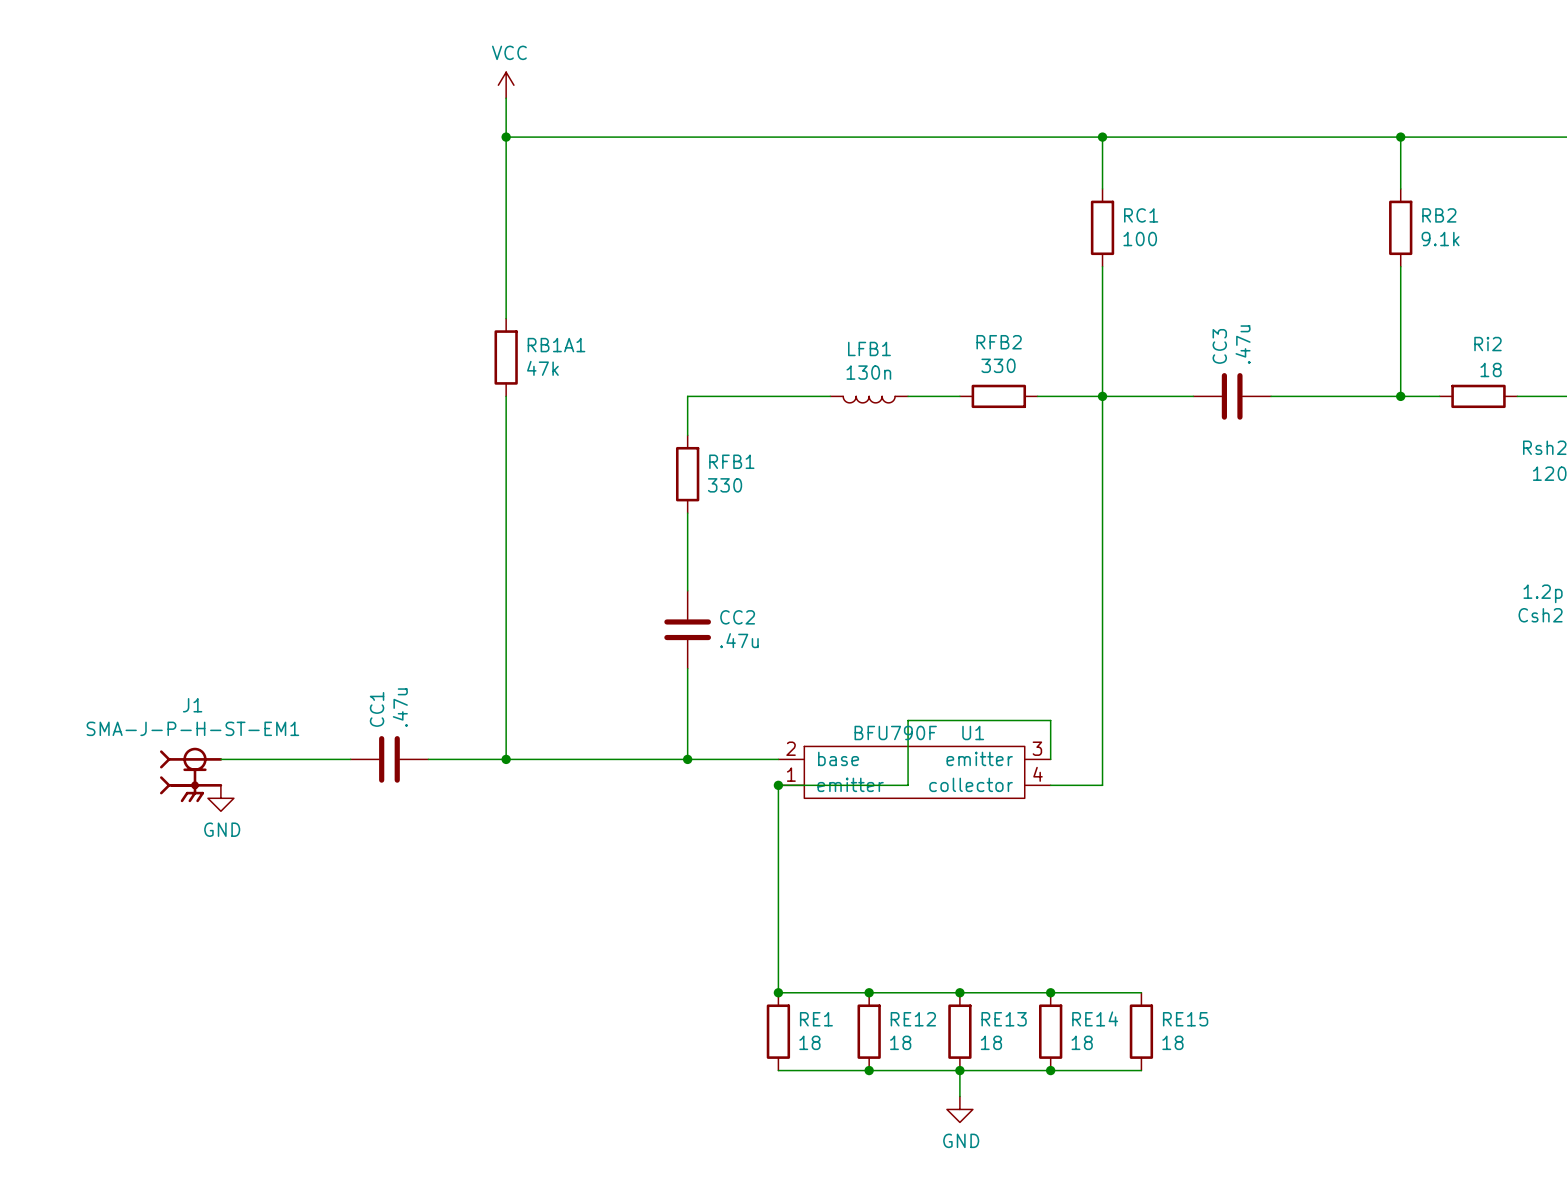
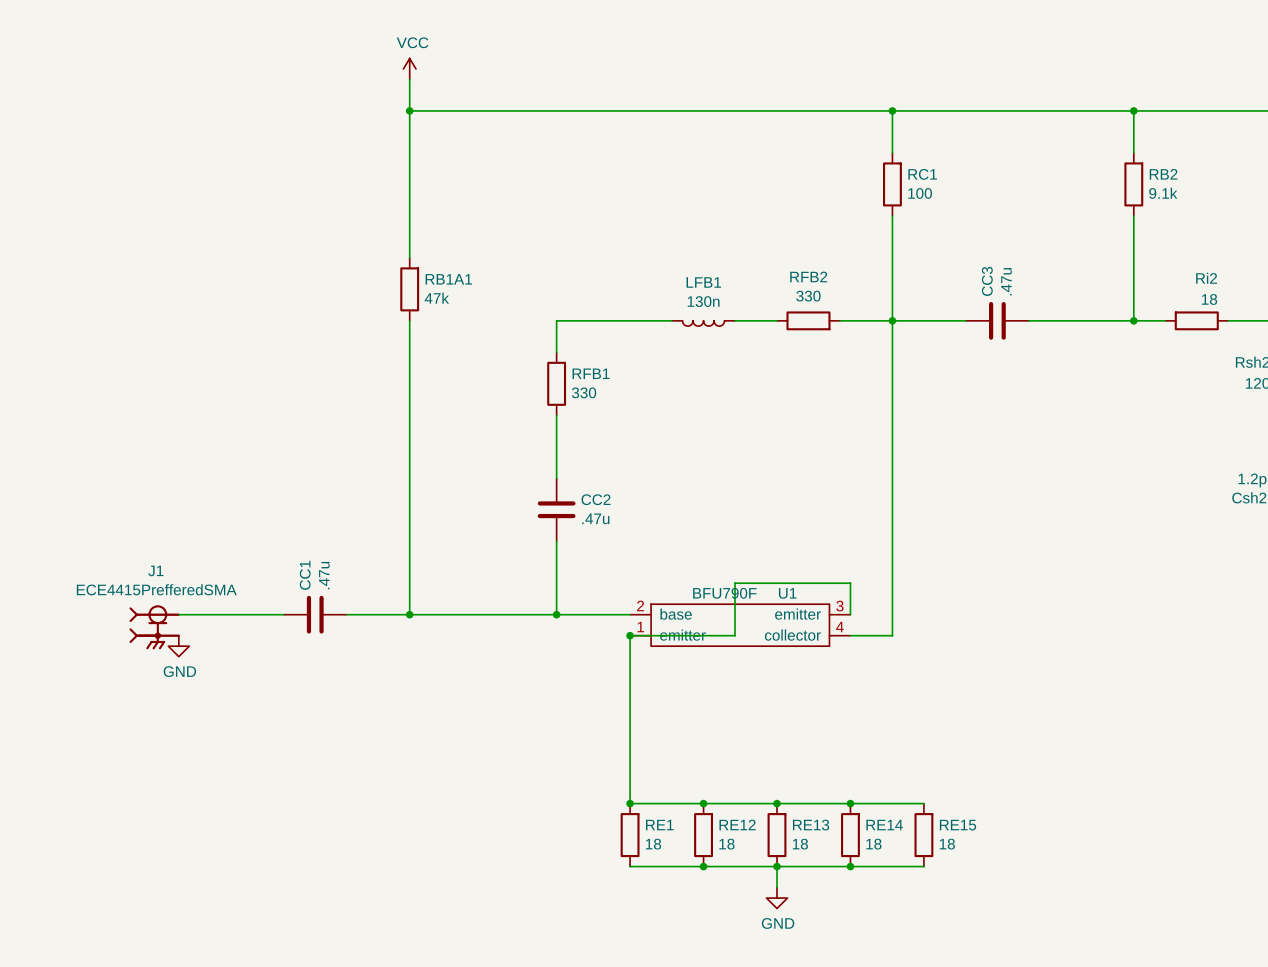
J1 value: SMA-J-P-H-ST-EM1 (192, 728) -> ECE4415PrefferedSMA (156, 589)

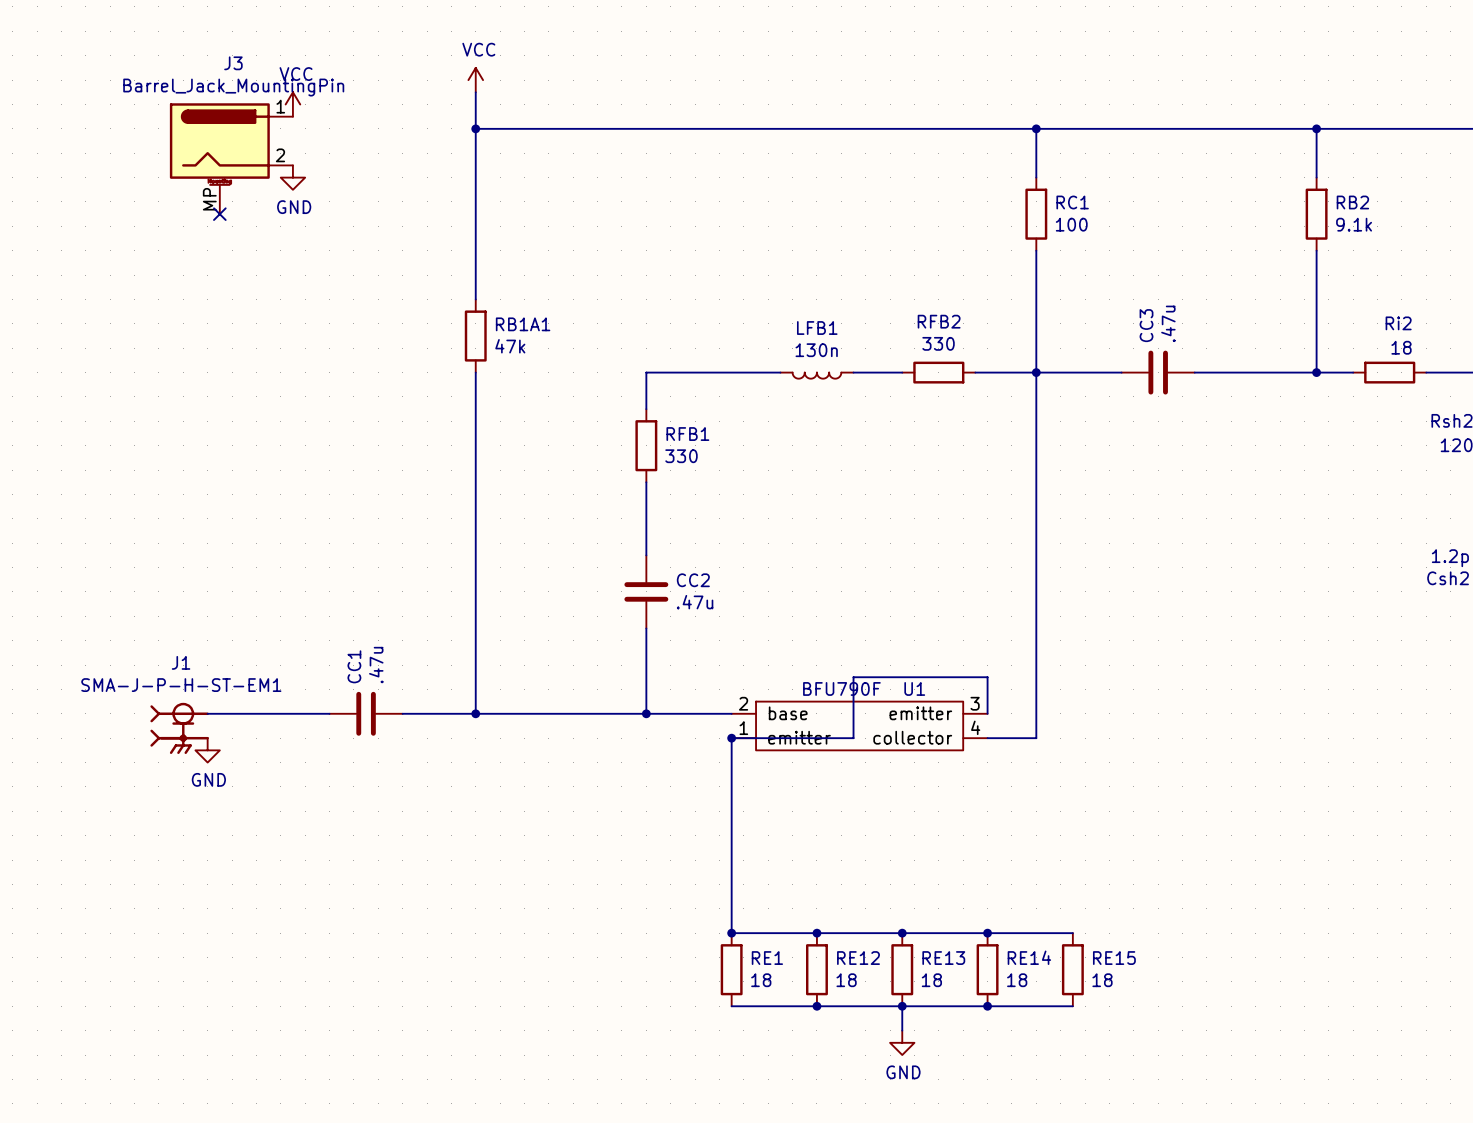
power symbol: none -> VCC (292, 104)
J3: none -> Barrel_Jack_MountingPin (231, 158)
power symbol: none -> GND (292, 177)
no-connect mark: none -> (219, 214)
J1 value: ECE4415PrefferedSMA (156, 589) -> SMA-J-P-H-ST-EM1 (181, 685)

